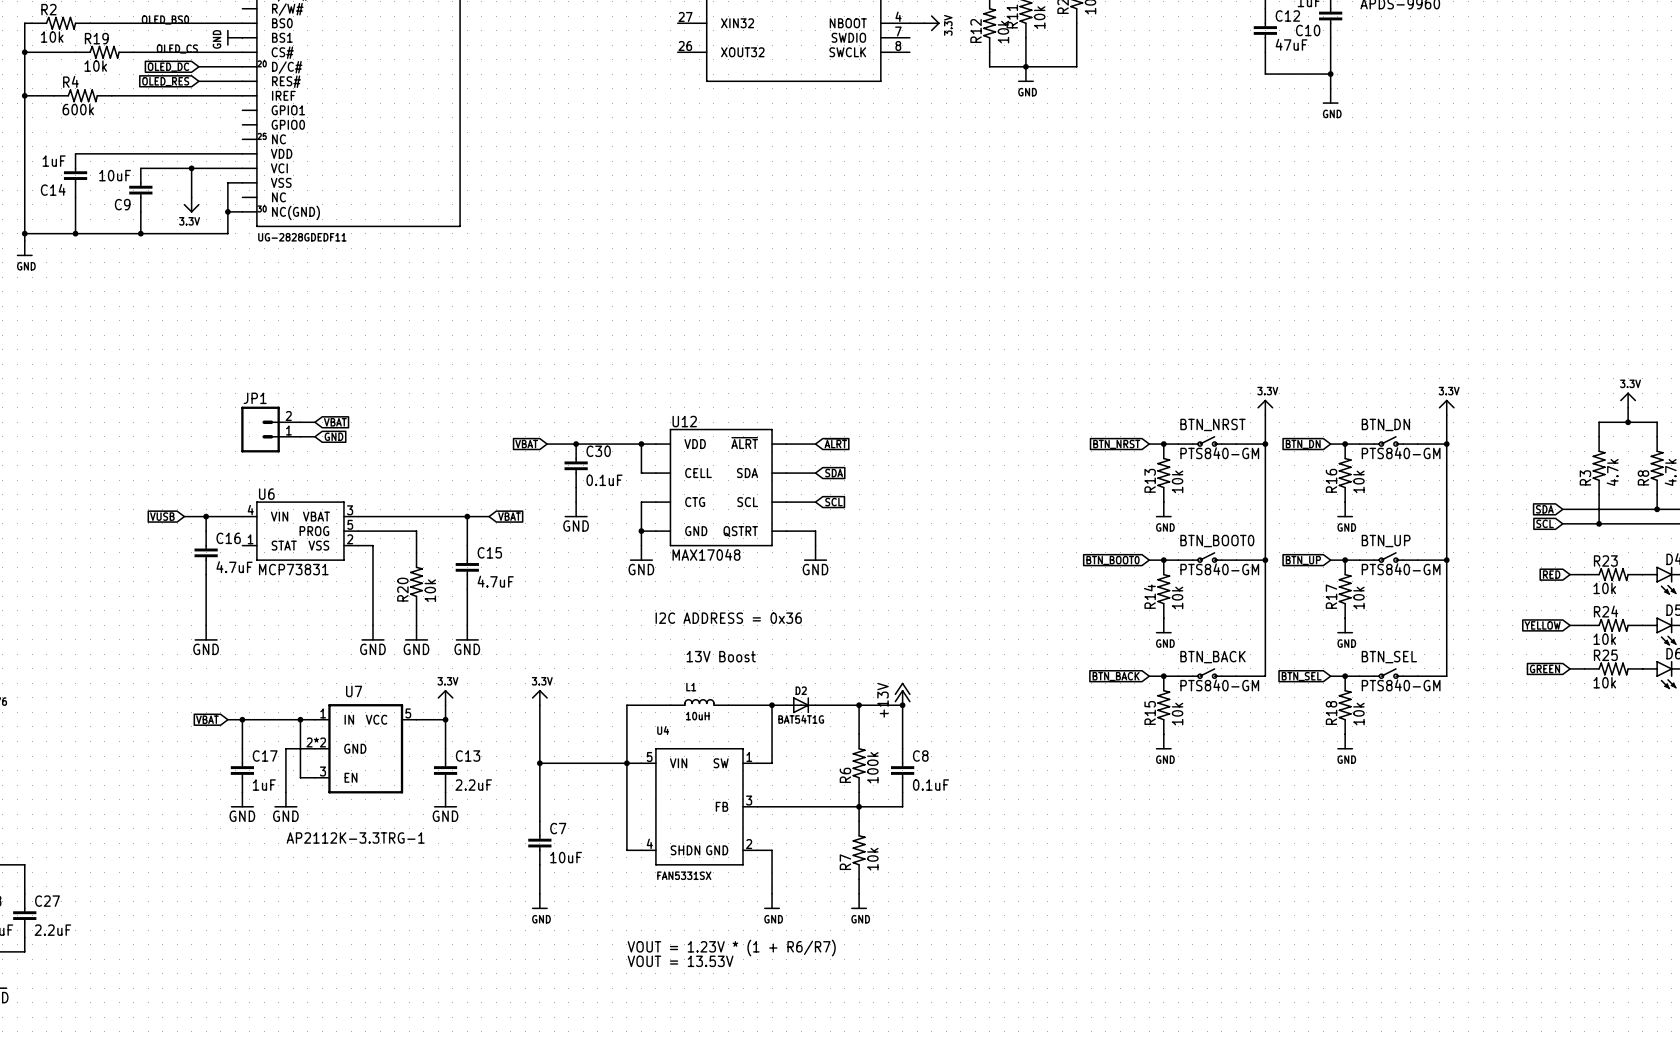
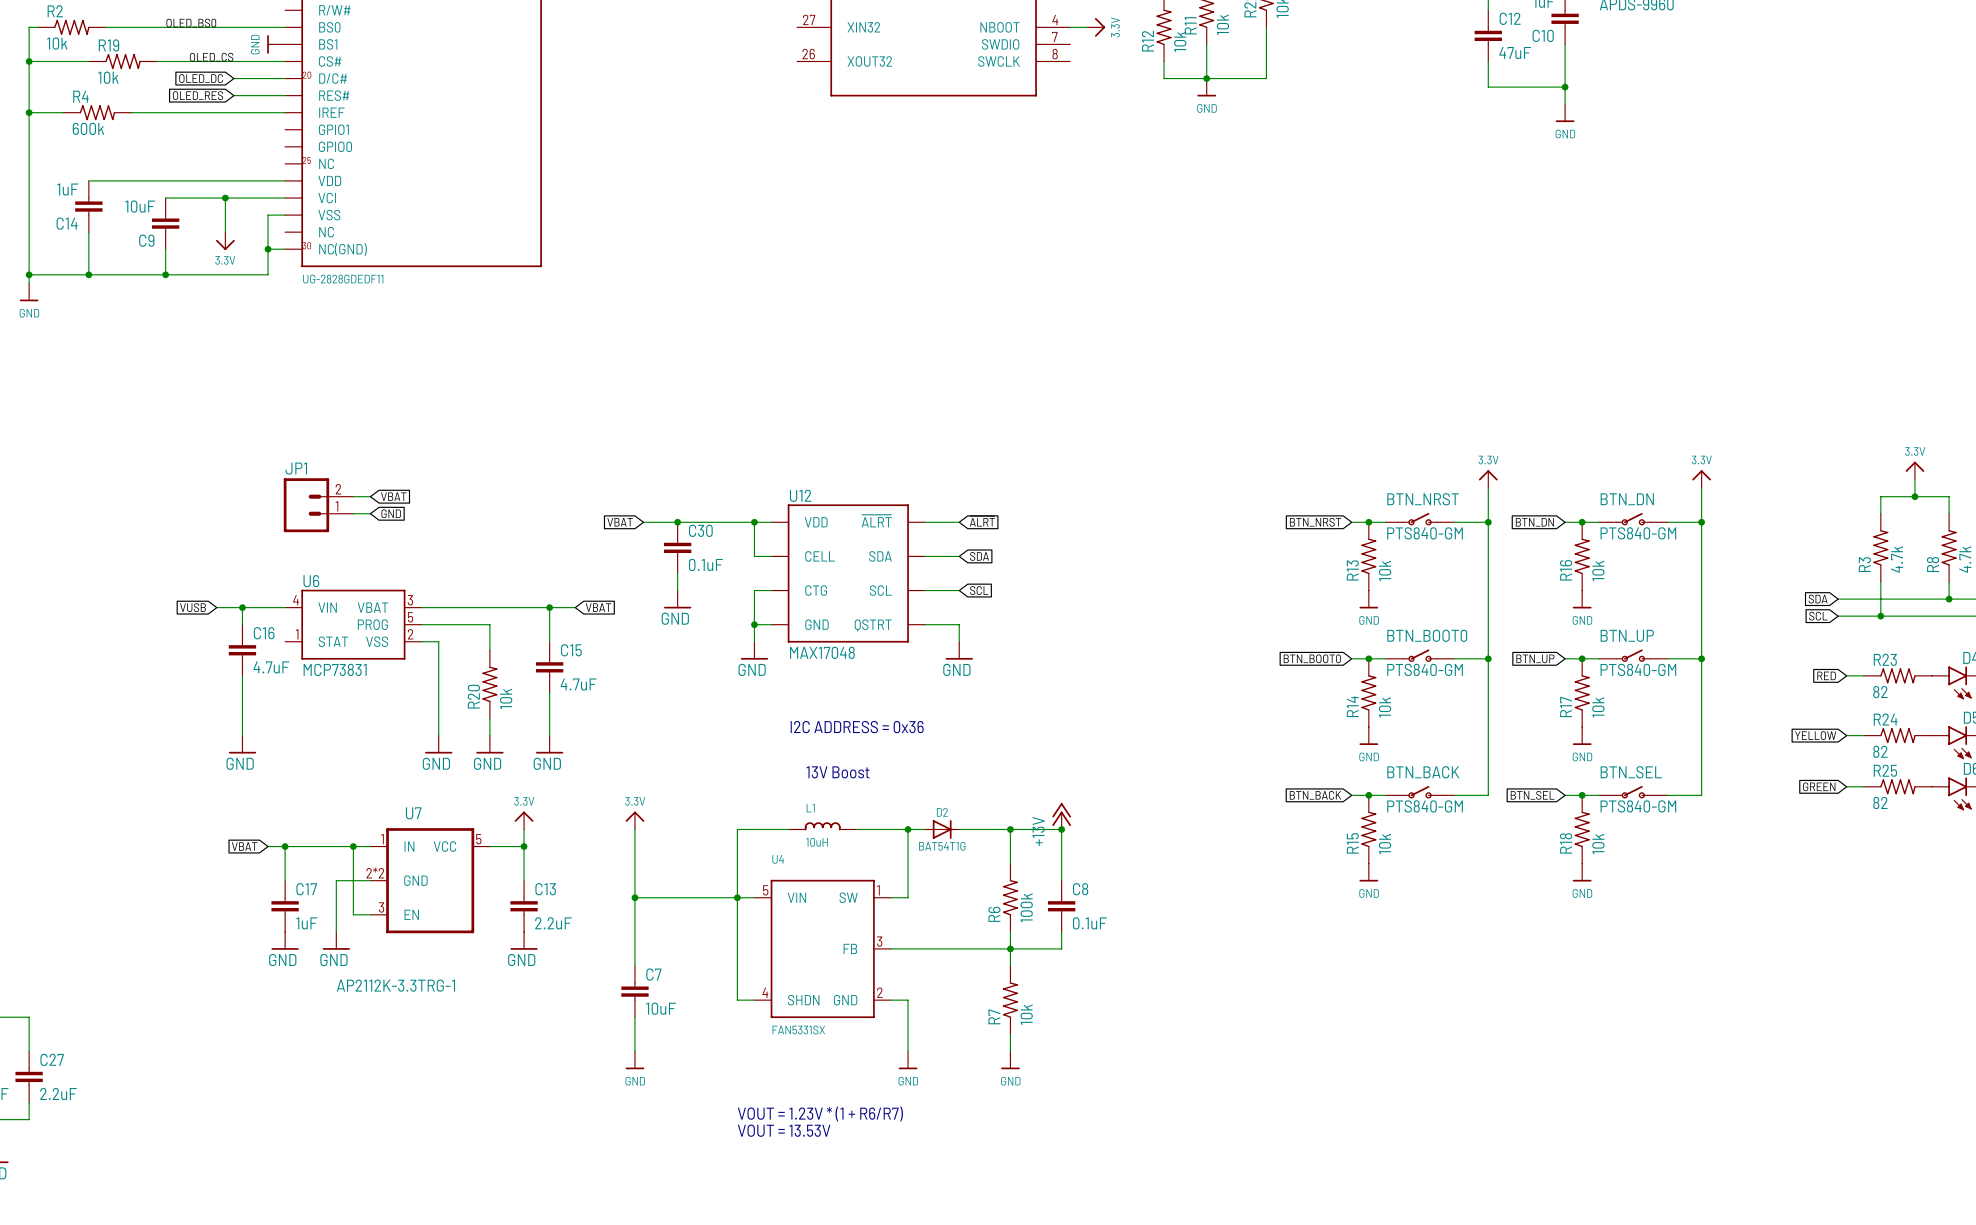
R23 value: 10k (1604, 588) -> 82 (1880, 692)
R24 value: 10k (1604, 639) -> 82 (1880, 751)
R25 value: 10k (1604, 682) -> 82 (1880, 803)

